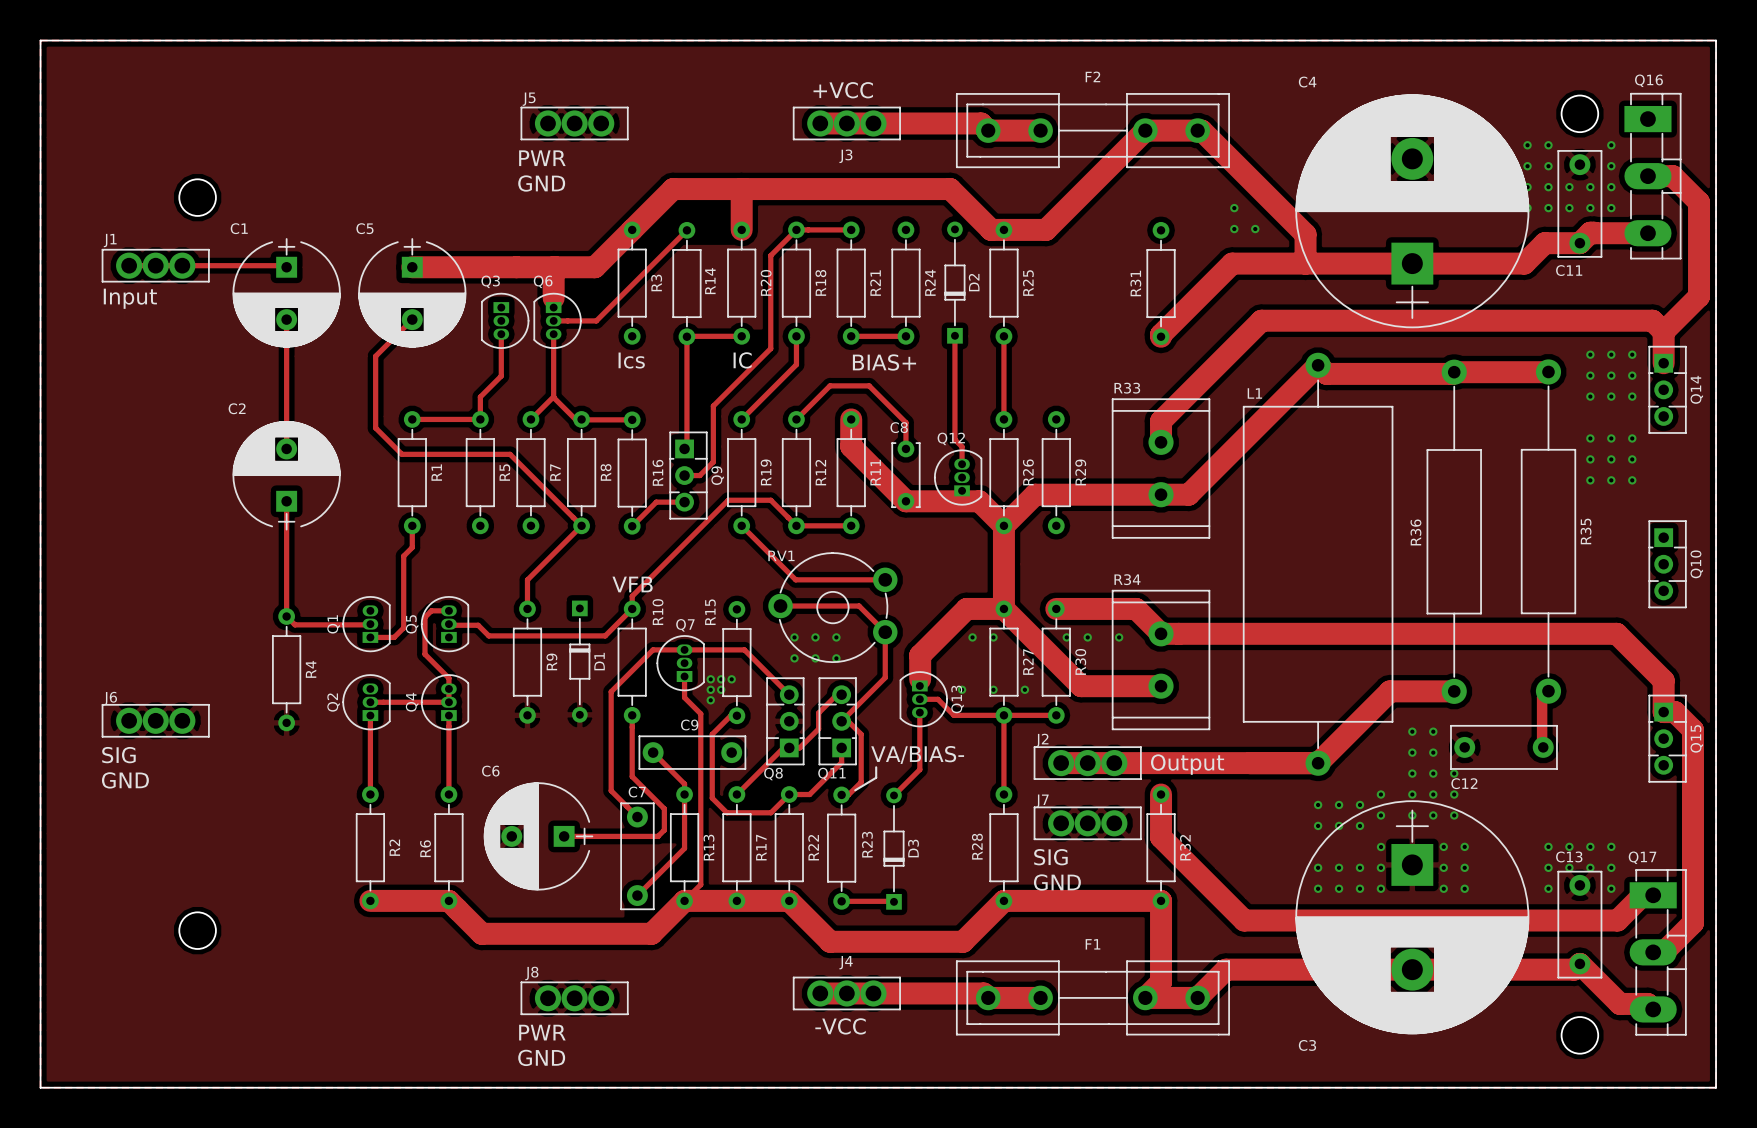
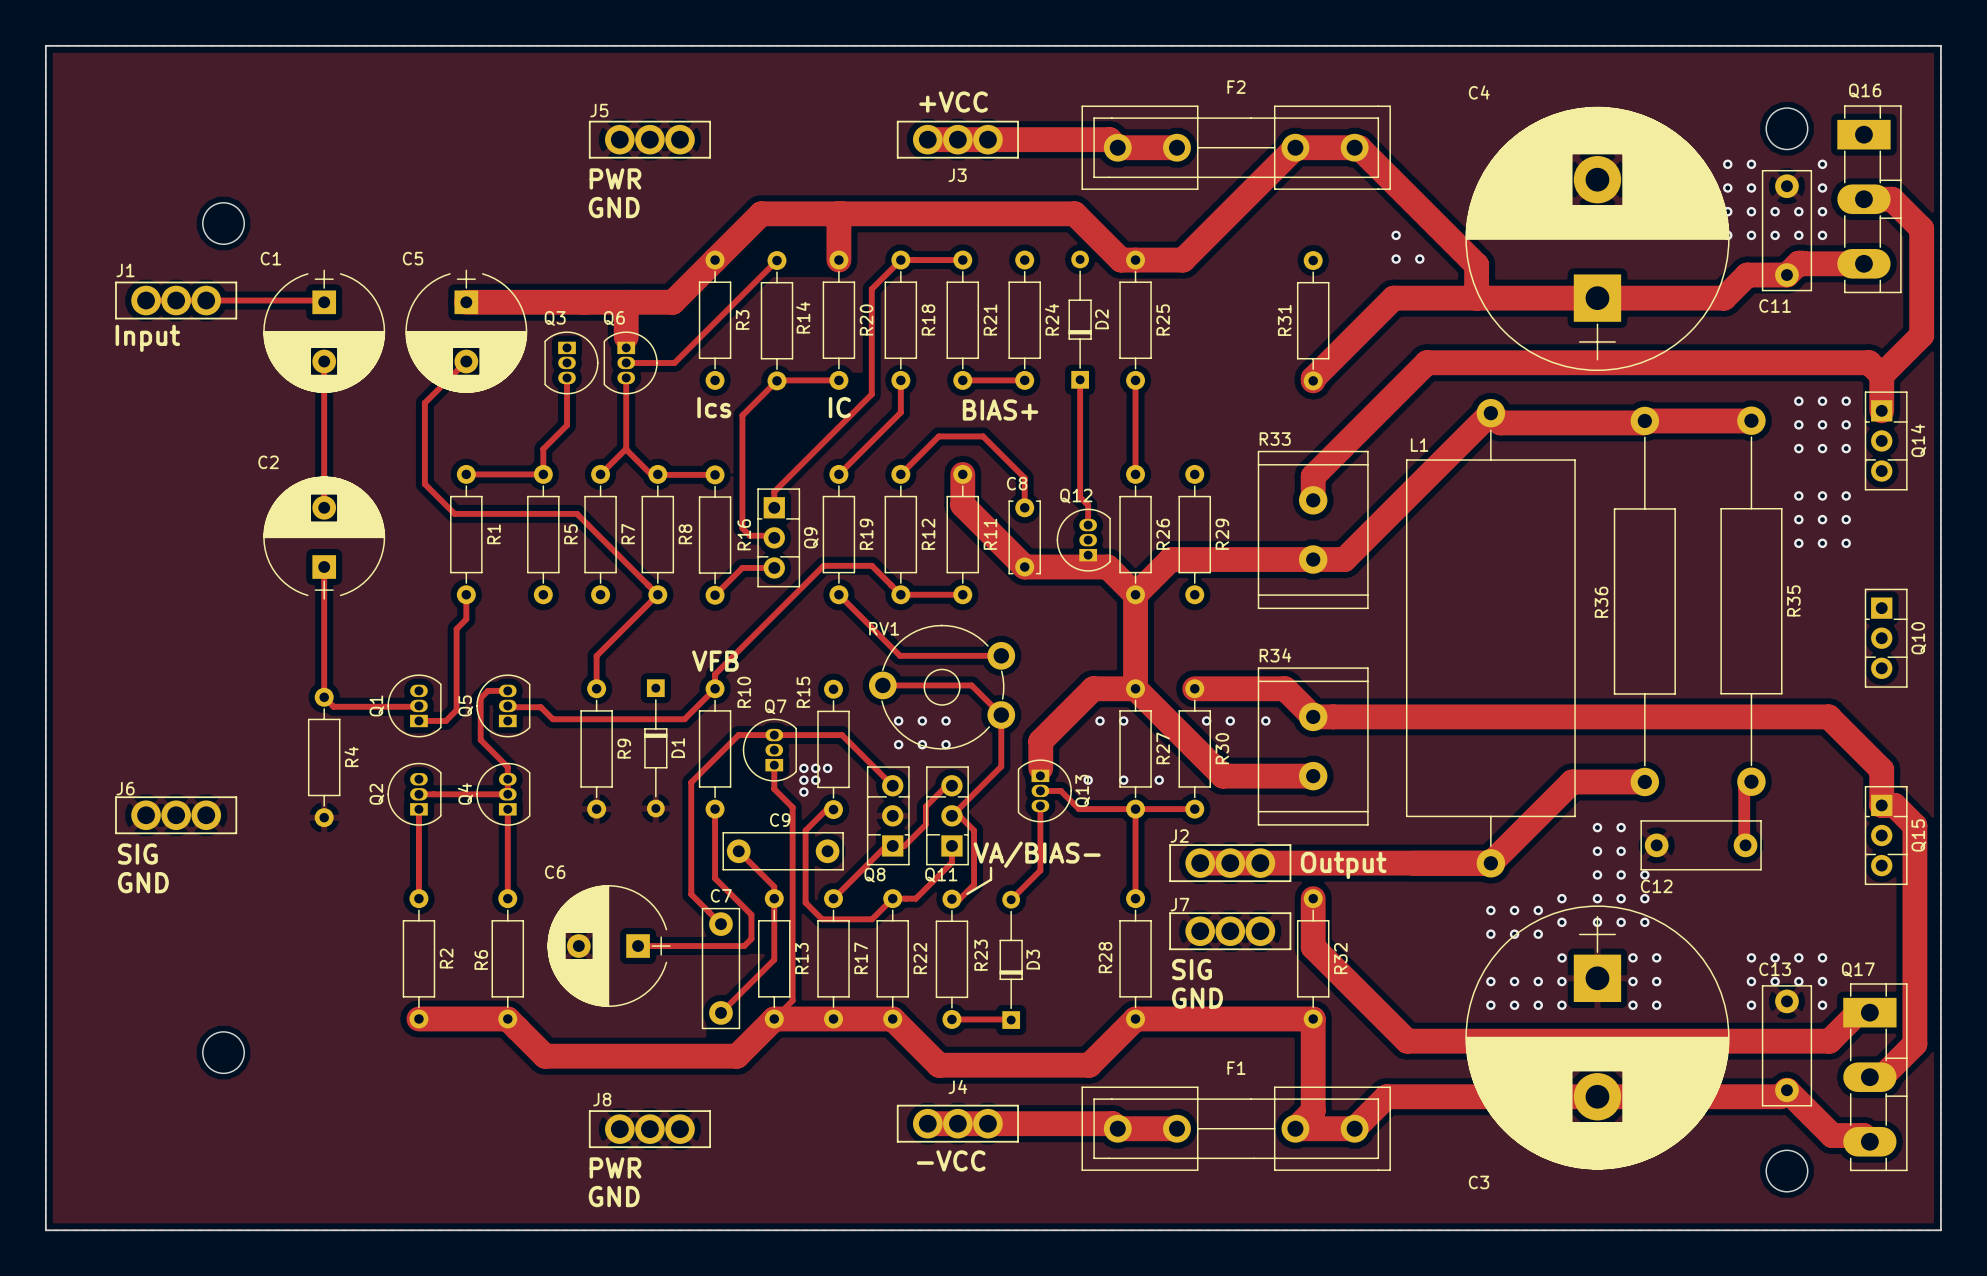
track: (686, 336) (686, 446) (684, 448) -> (776, 380) (742, 415) (742, 528) (749, 535) (772, 535)
track: (713, 406) (713, 462) (699, 475) (684, 475) -> (806, 459) (774, 491) (774, 507)

